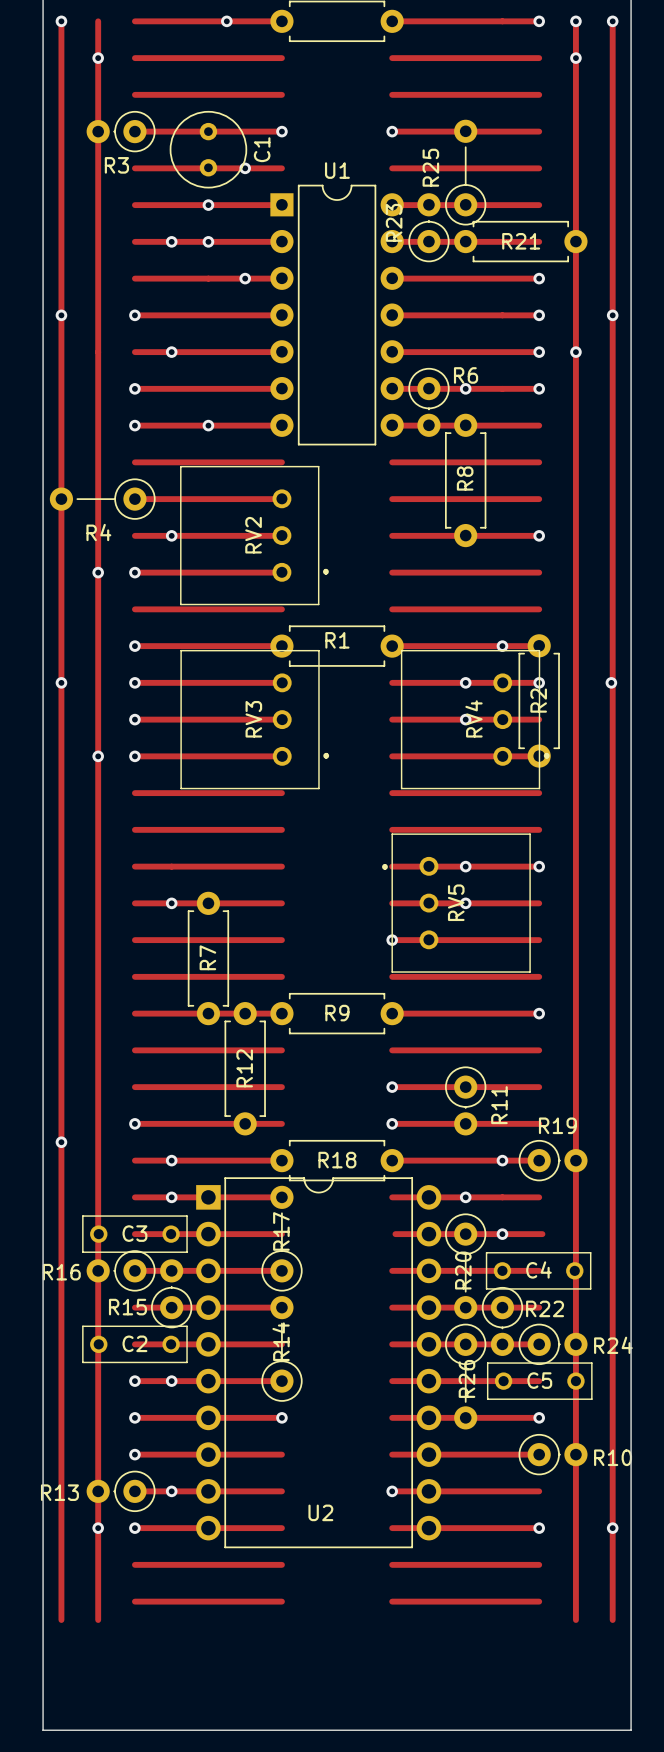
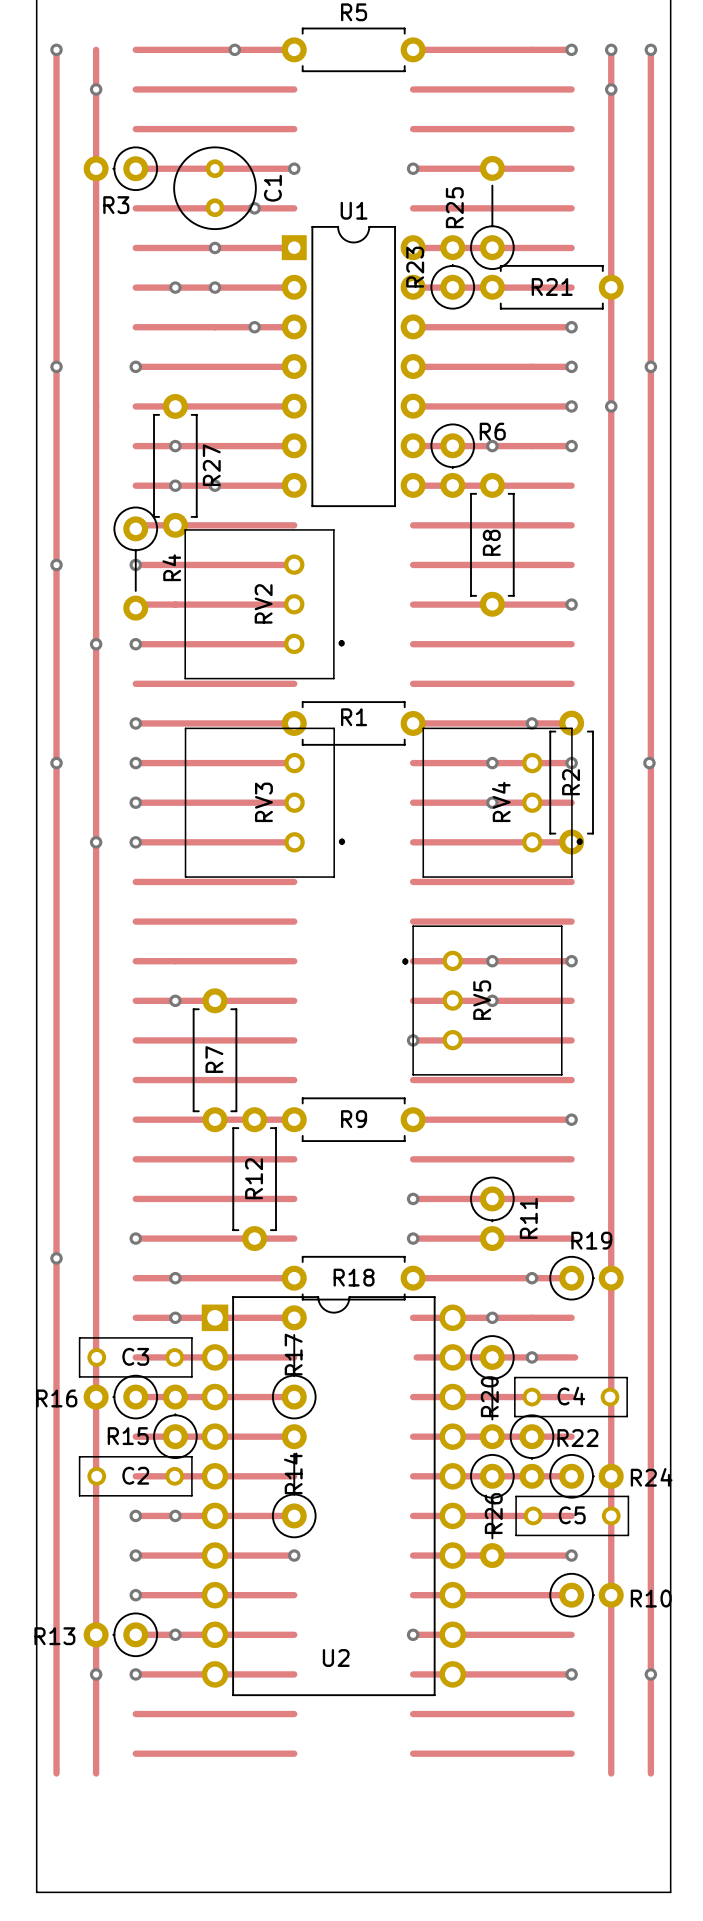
via: (171, 352) -> none
via: (134, 388) -> none
via: none -> (175, 446)
R27: none -> (175, 465)
via: (134, 425) -> none
via: none -> (175, 485)
via: none -> (56, 564)
R4 rotation: 0° (102, 499) -> 90° counterclockwise (135, 563)
via: none -> (135, 564)
via: (171, 535) -> none

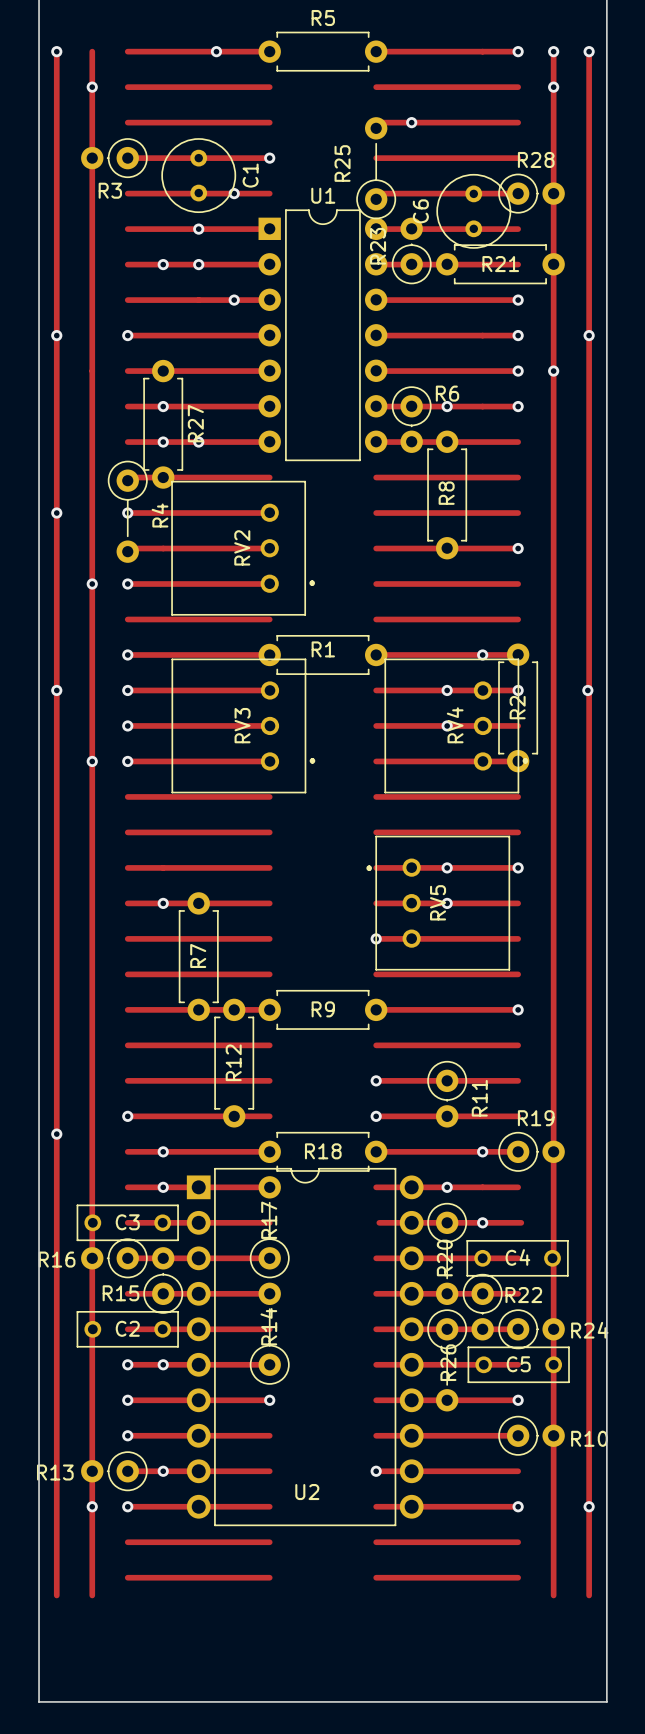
via position: (413, 168) -> (411, 122)
R28: none -> (531, 193)
R25 position: (492, 212) -> (376, 168)
C6: none -> (473, 211)

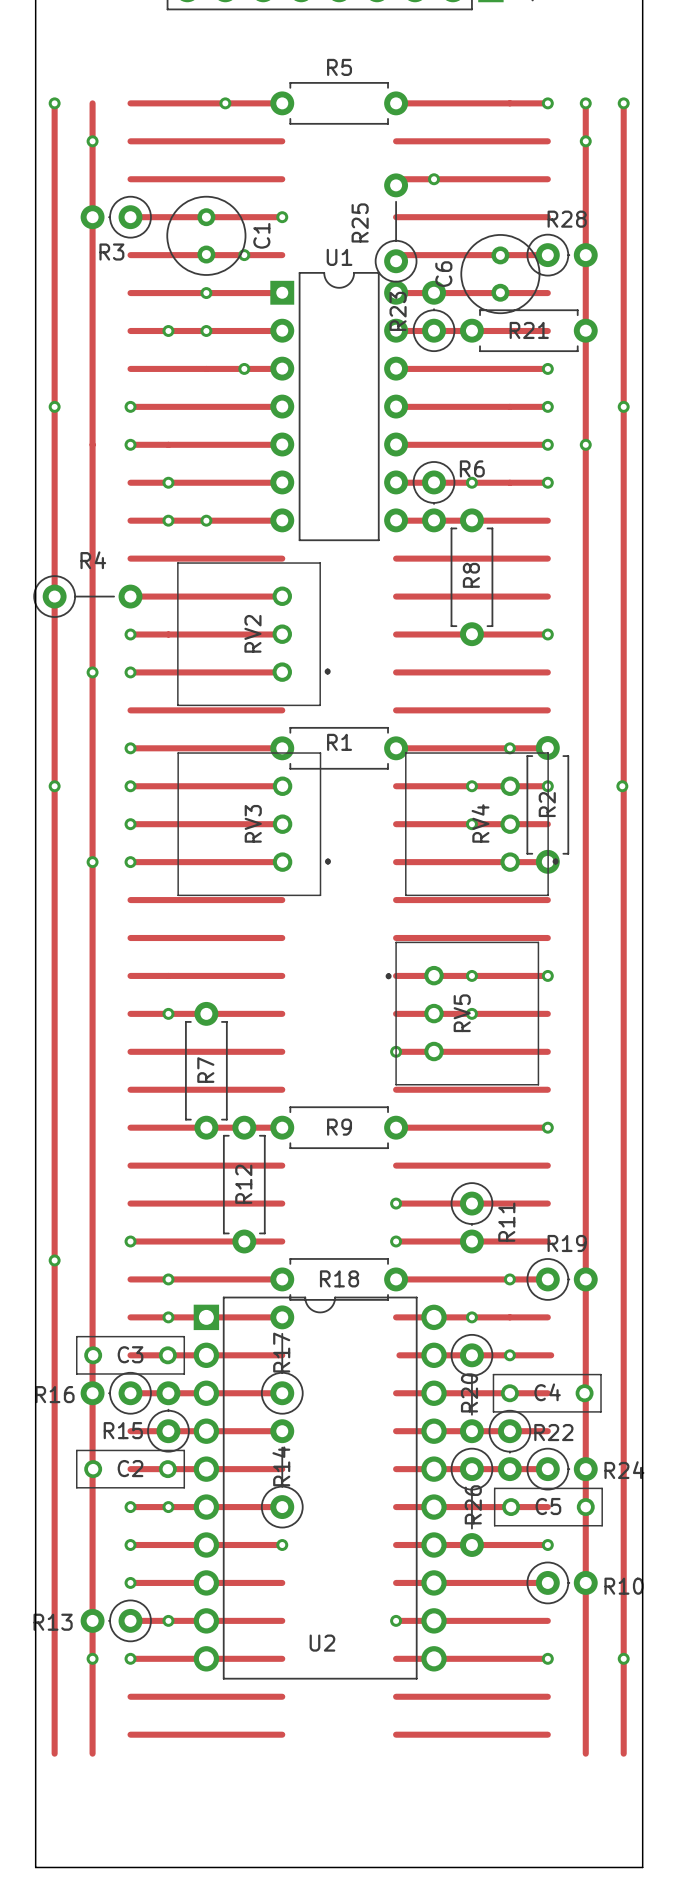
via: none -> (130, 444)
R27: (163, 424) -> none
R4 rotation: 0° (127, 511) -> 90° counterclockwise (87, 596)
via: (56, 513) -> none
via position: (127, 513) -> (130, 634)

